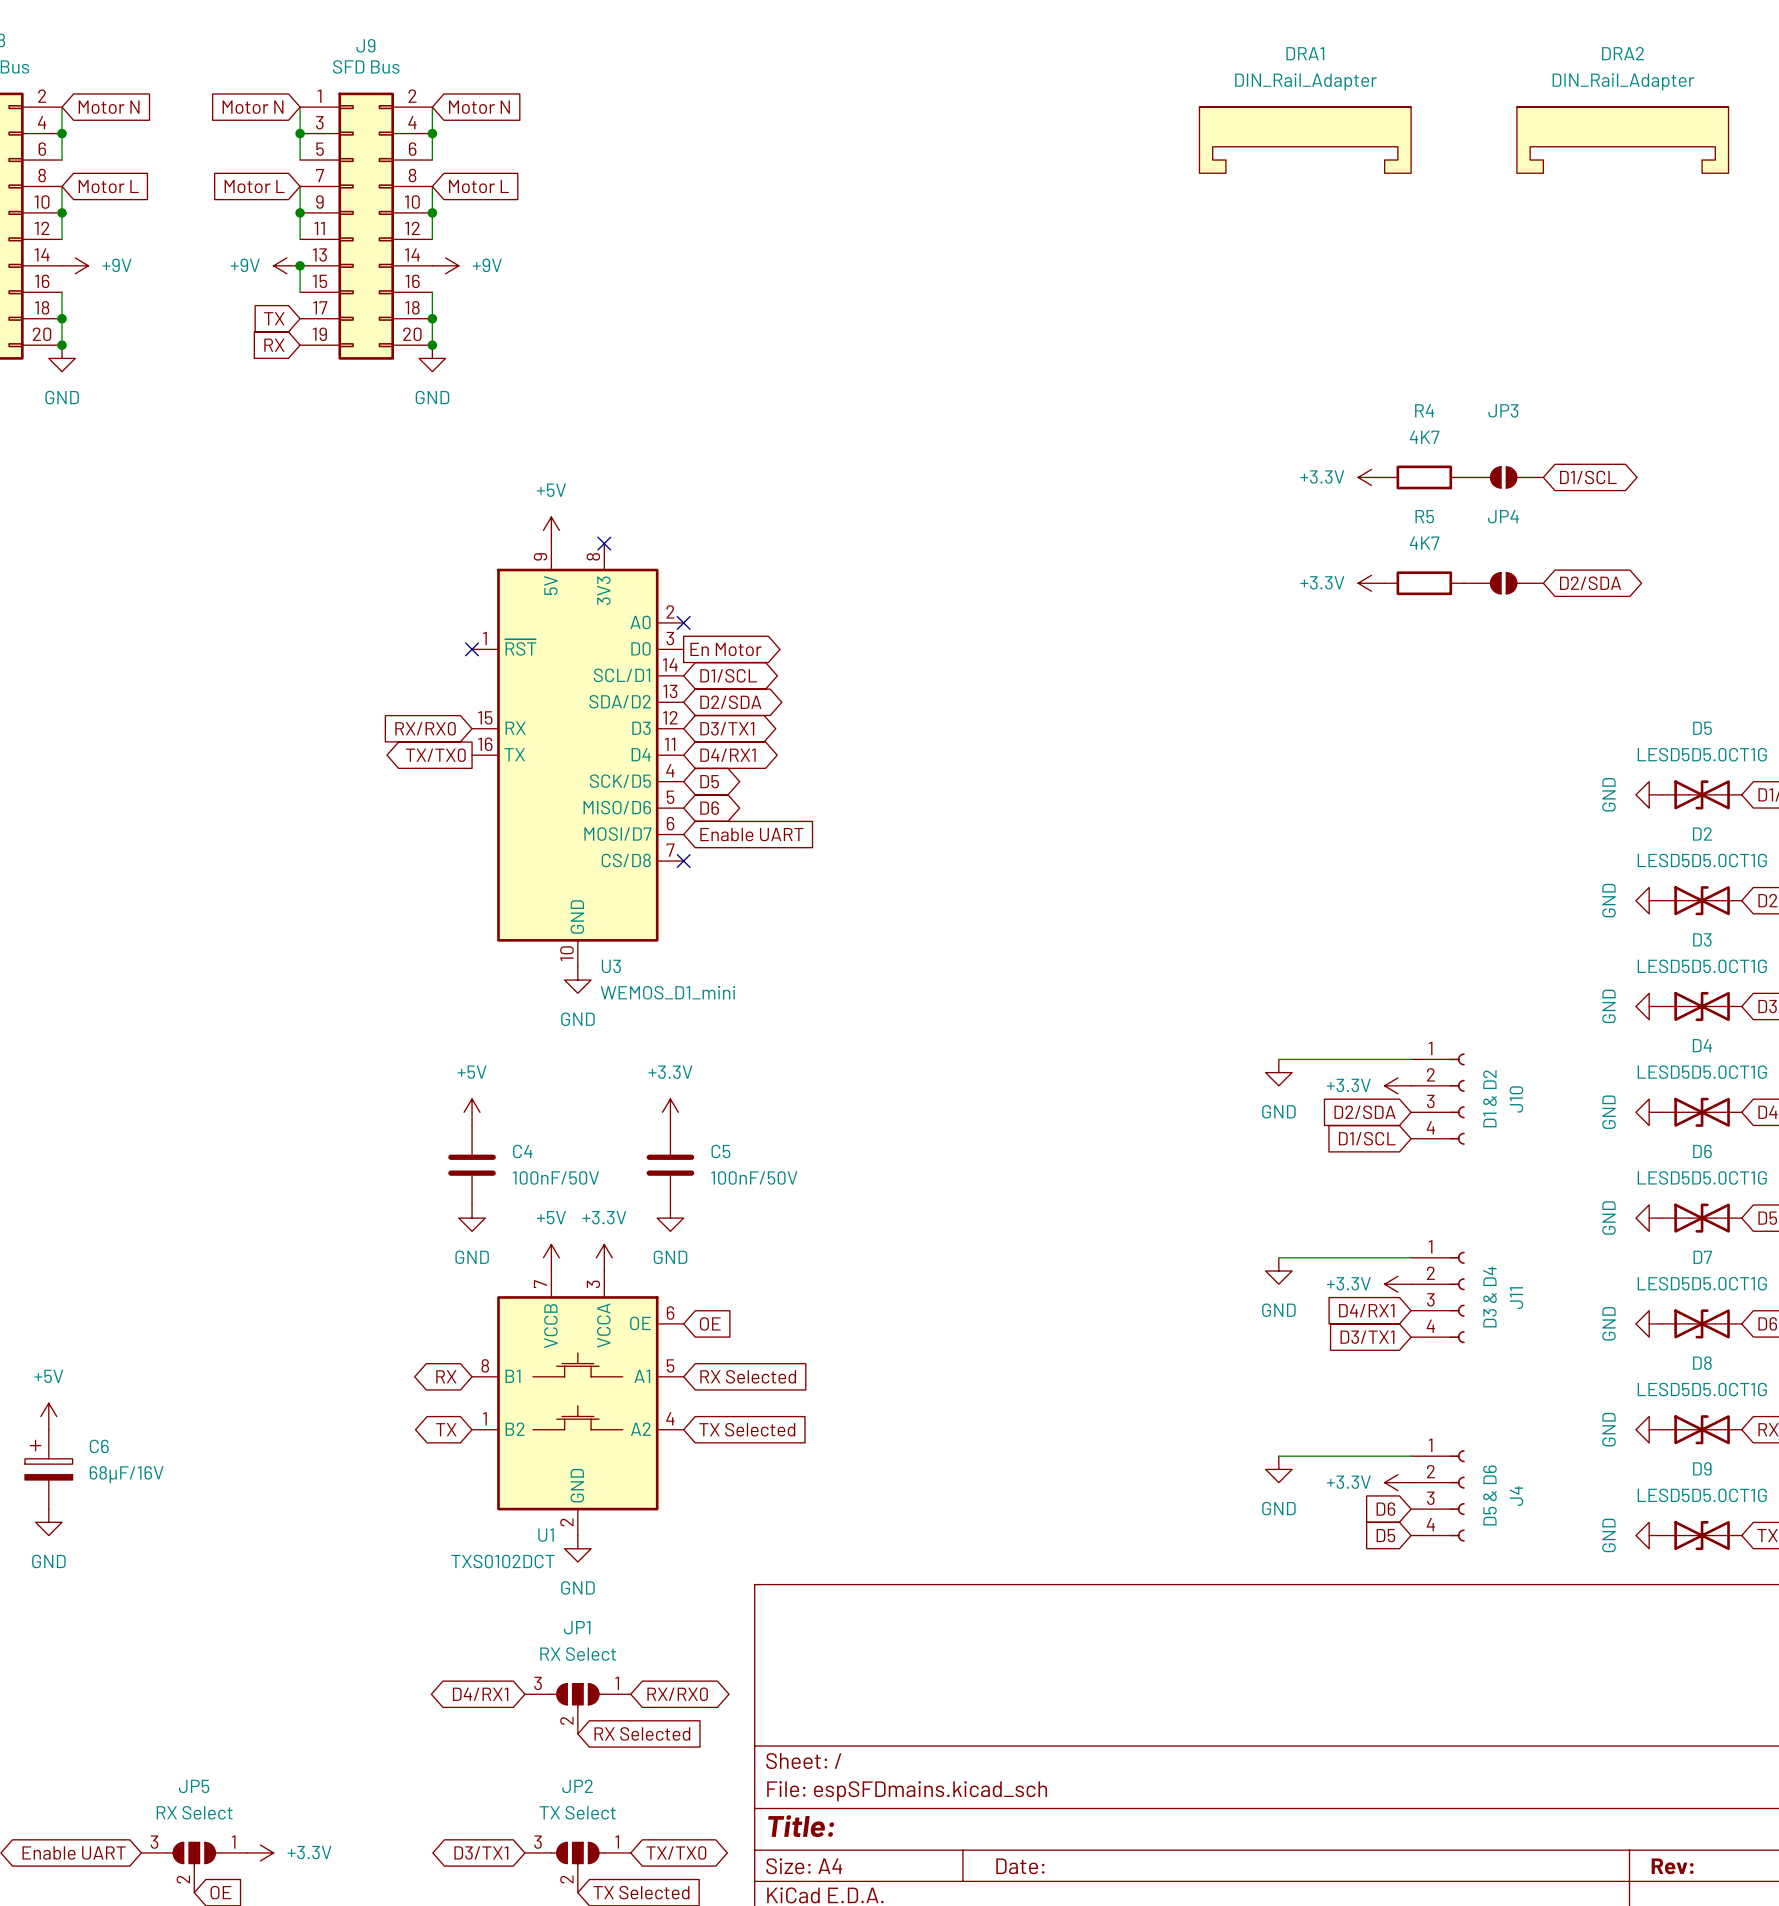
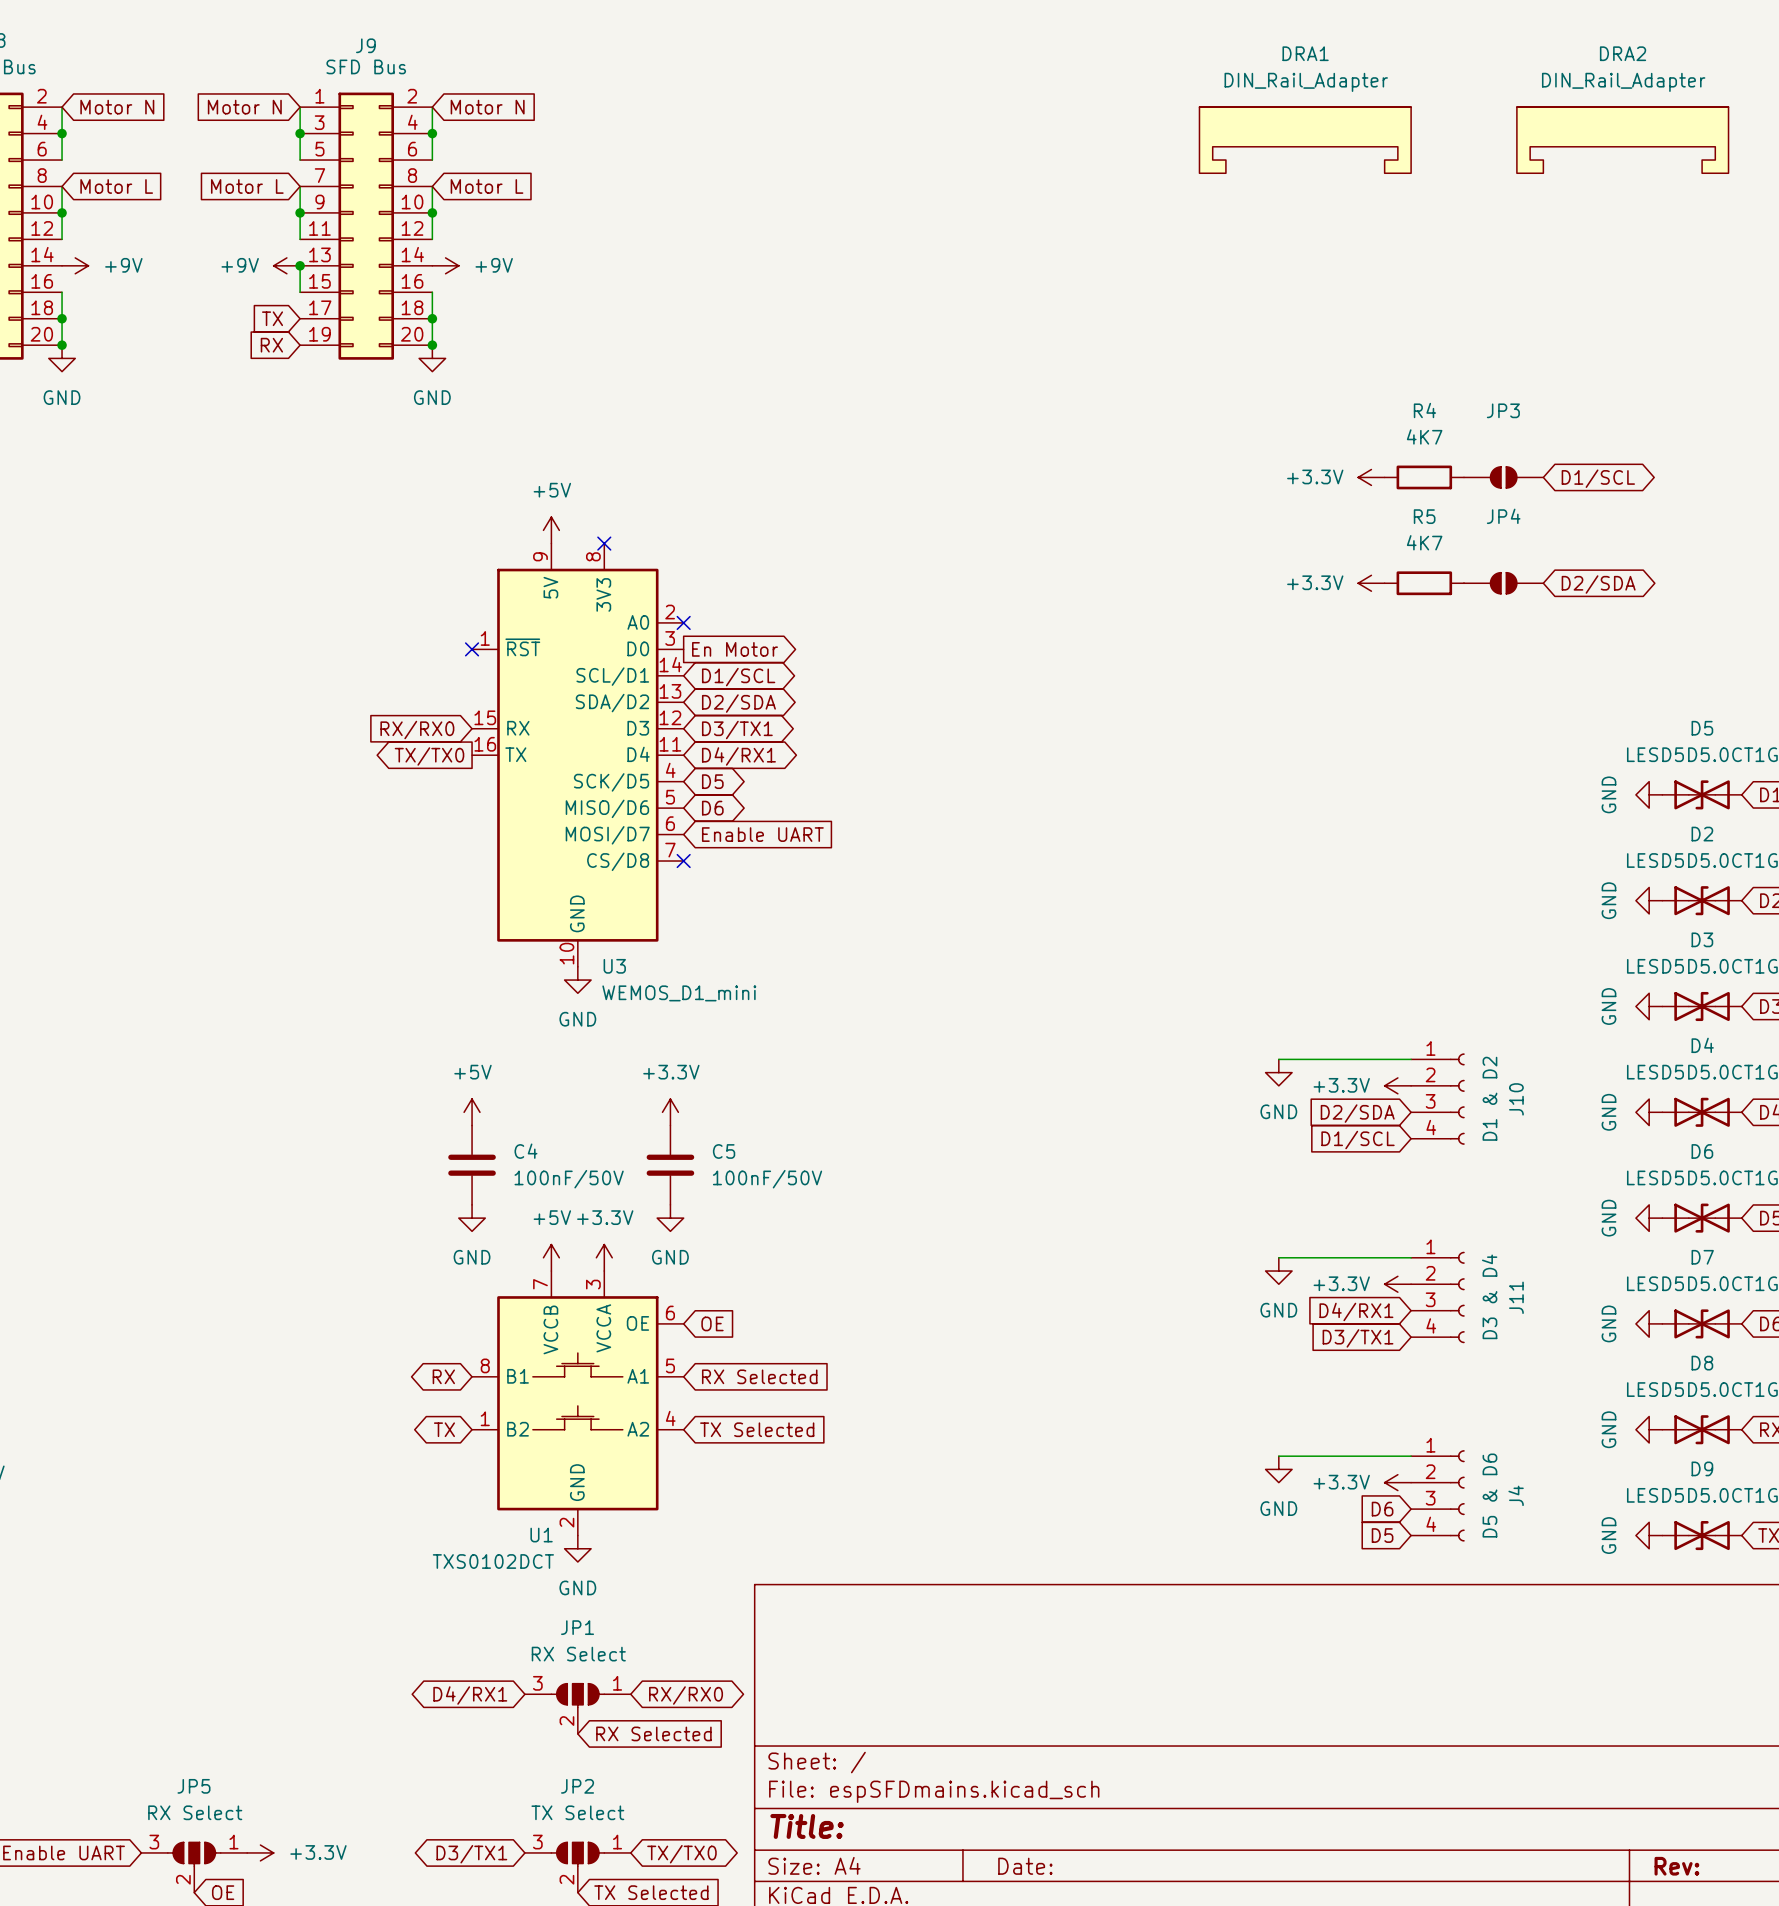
power symbol: +5V (48, 1416) -> none
C6: 68µF/16V (48, 1469) -> none
power symbol: GND (48, 1522) -> none

